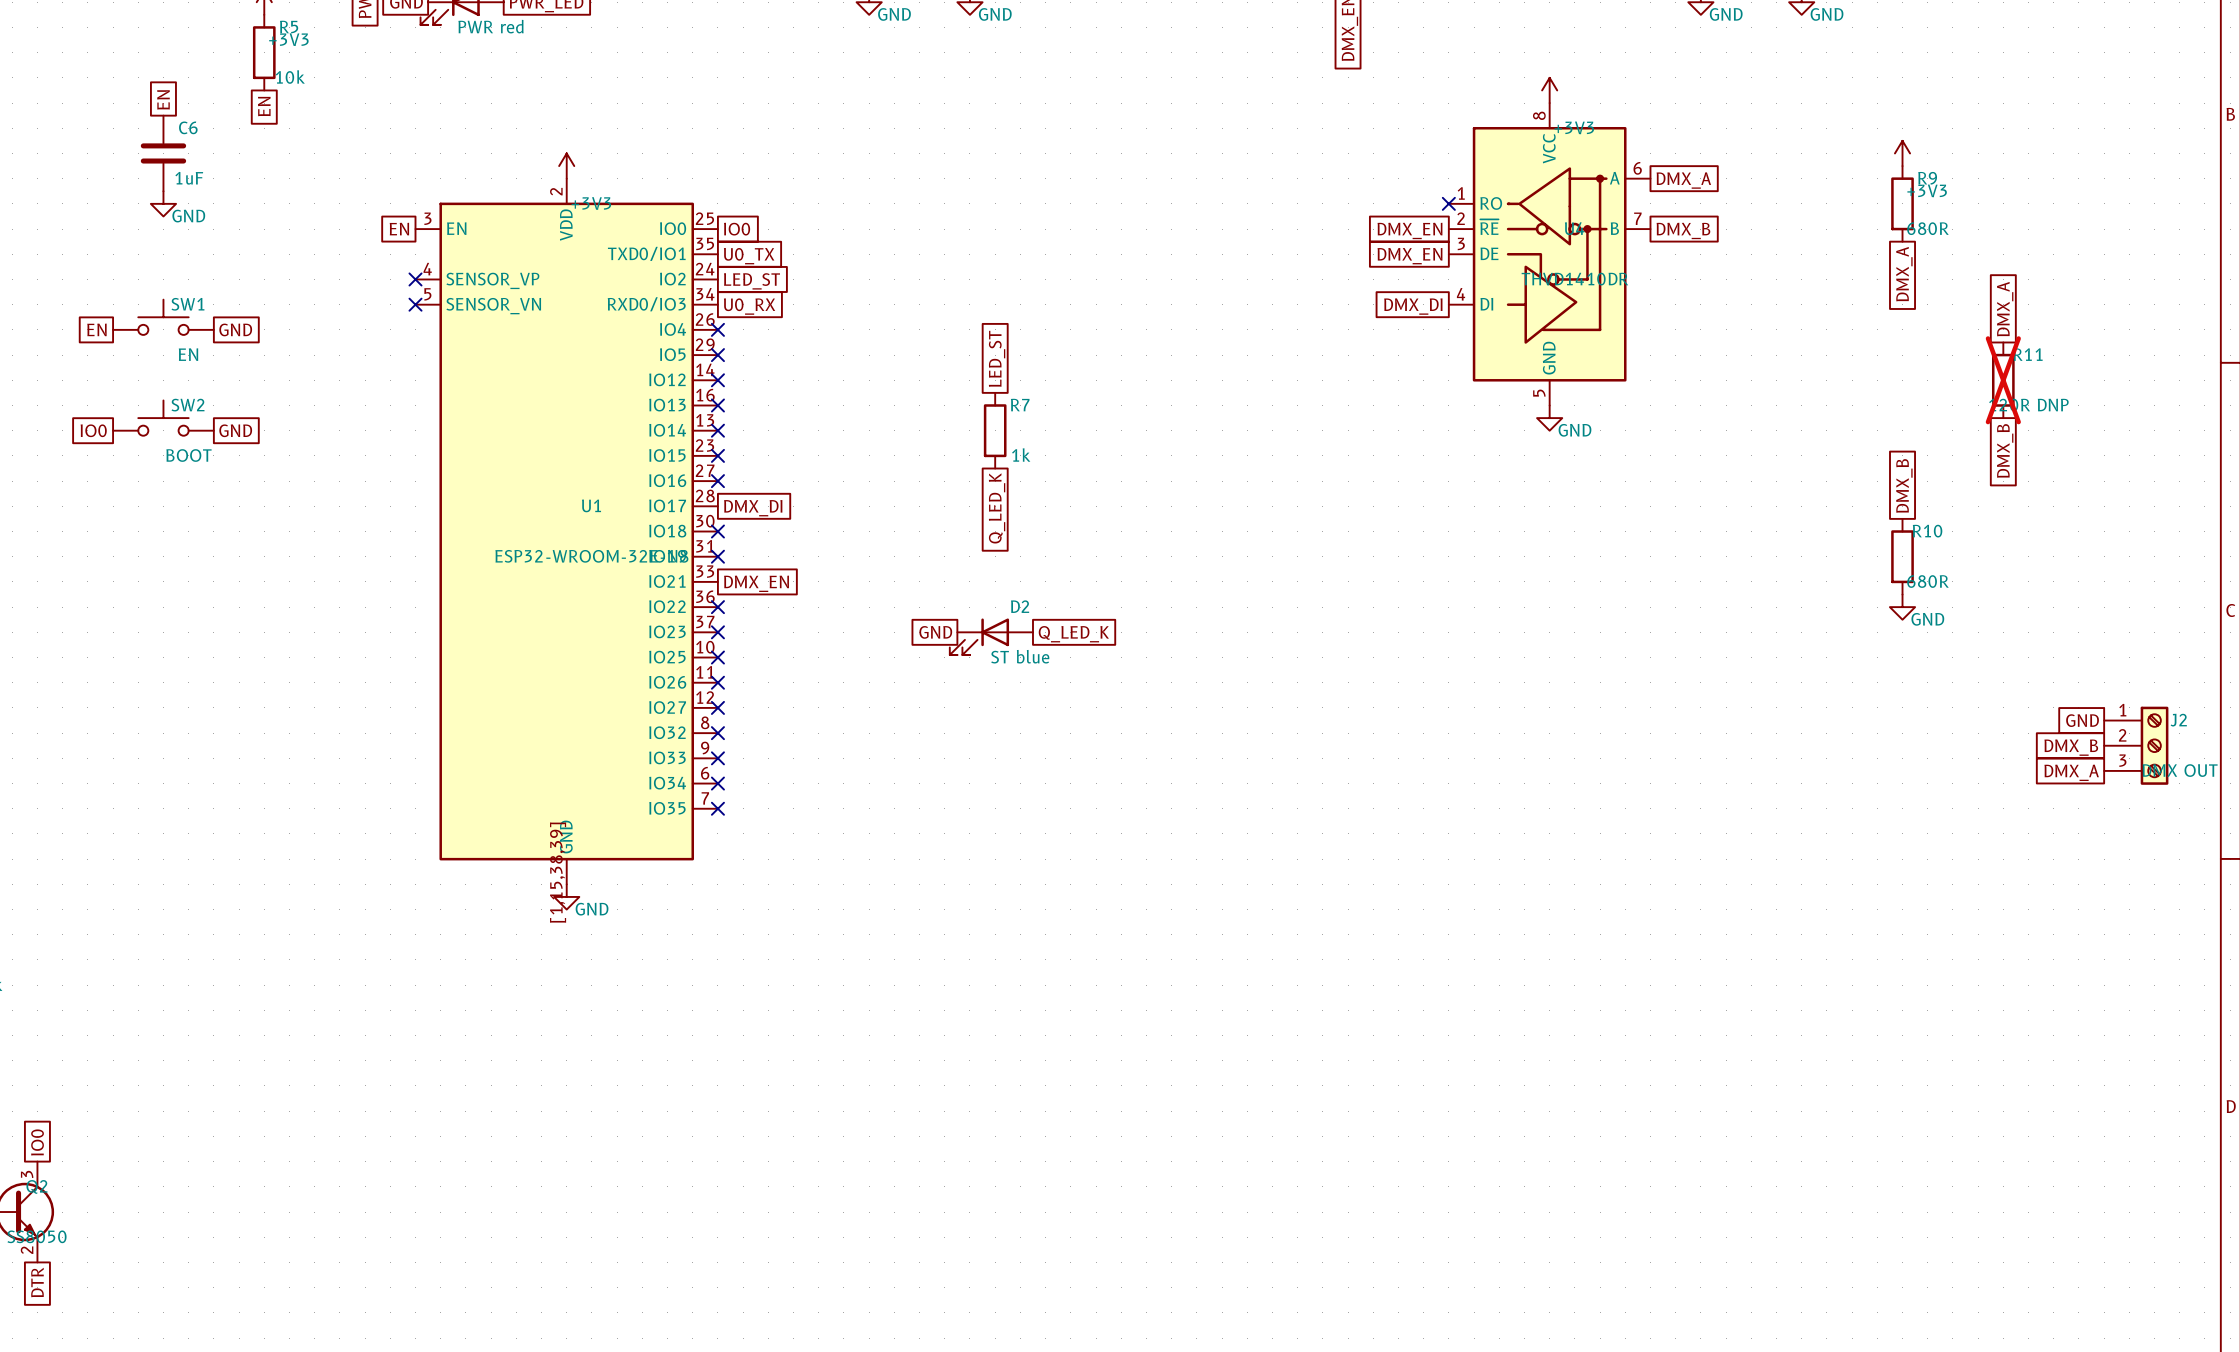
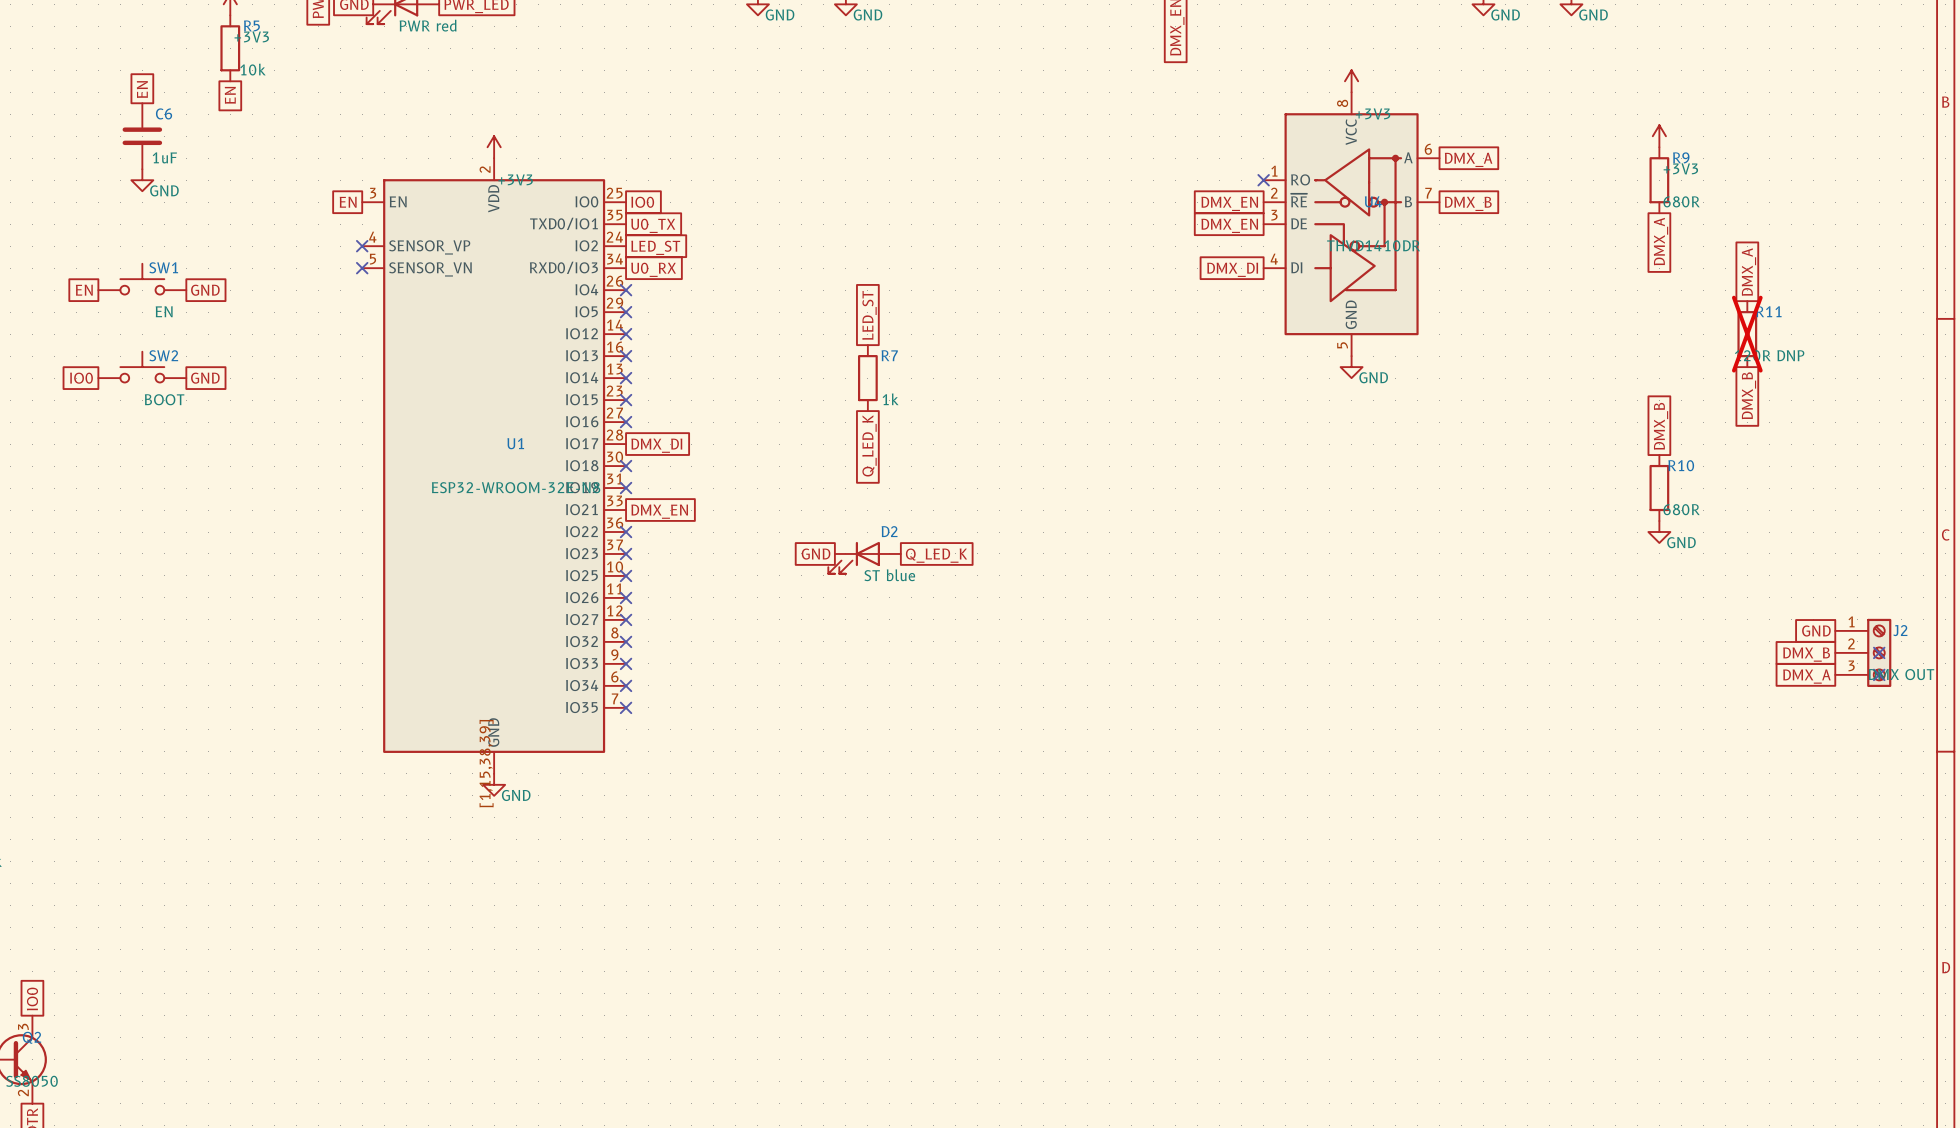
no-connect mark: none -> (1879, 652)
no-connect mark: none -> (1879, 674)

